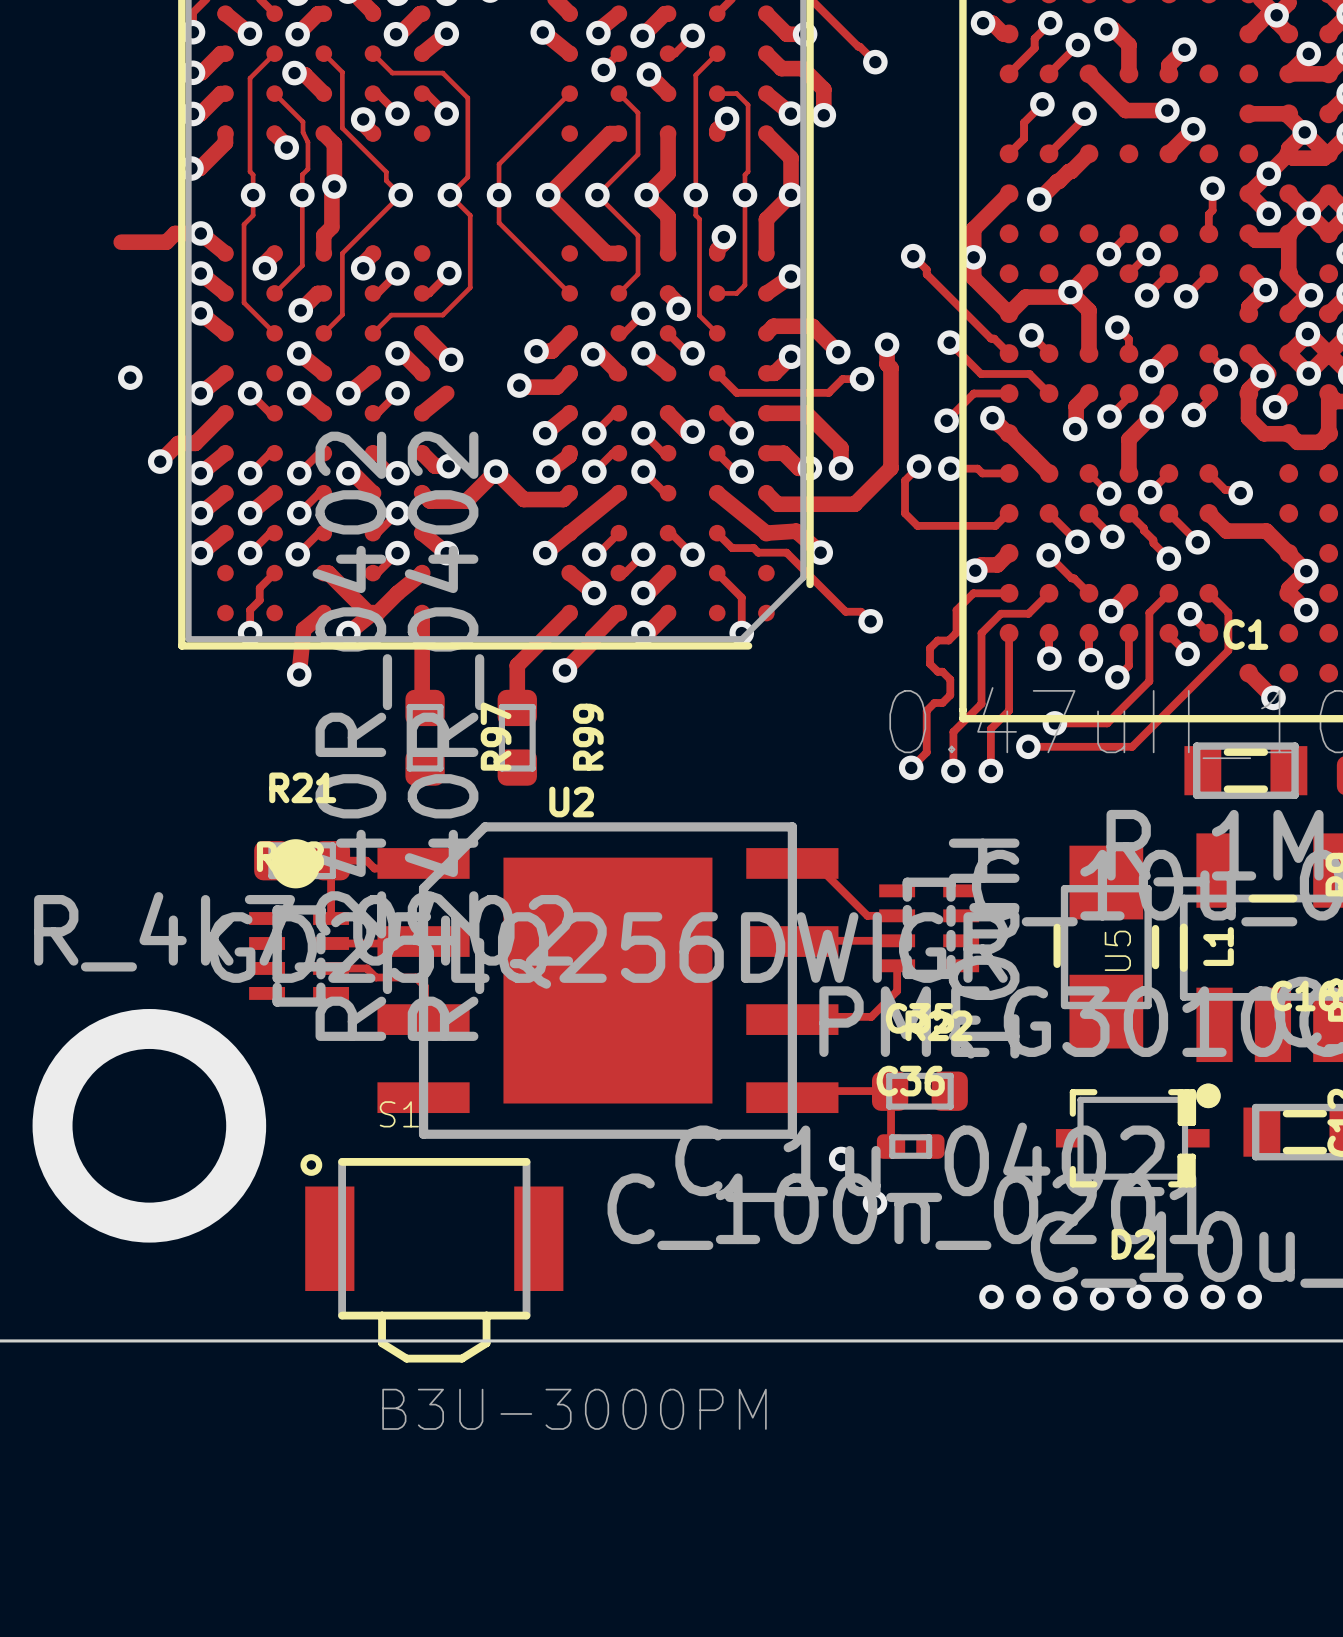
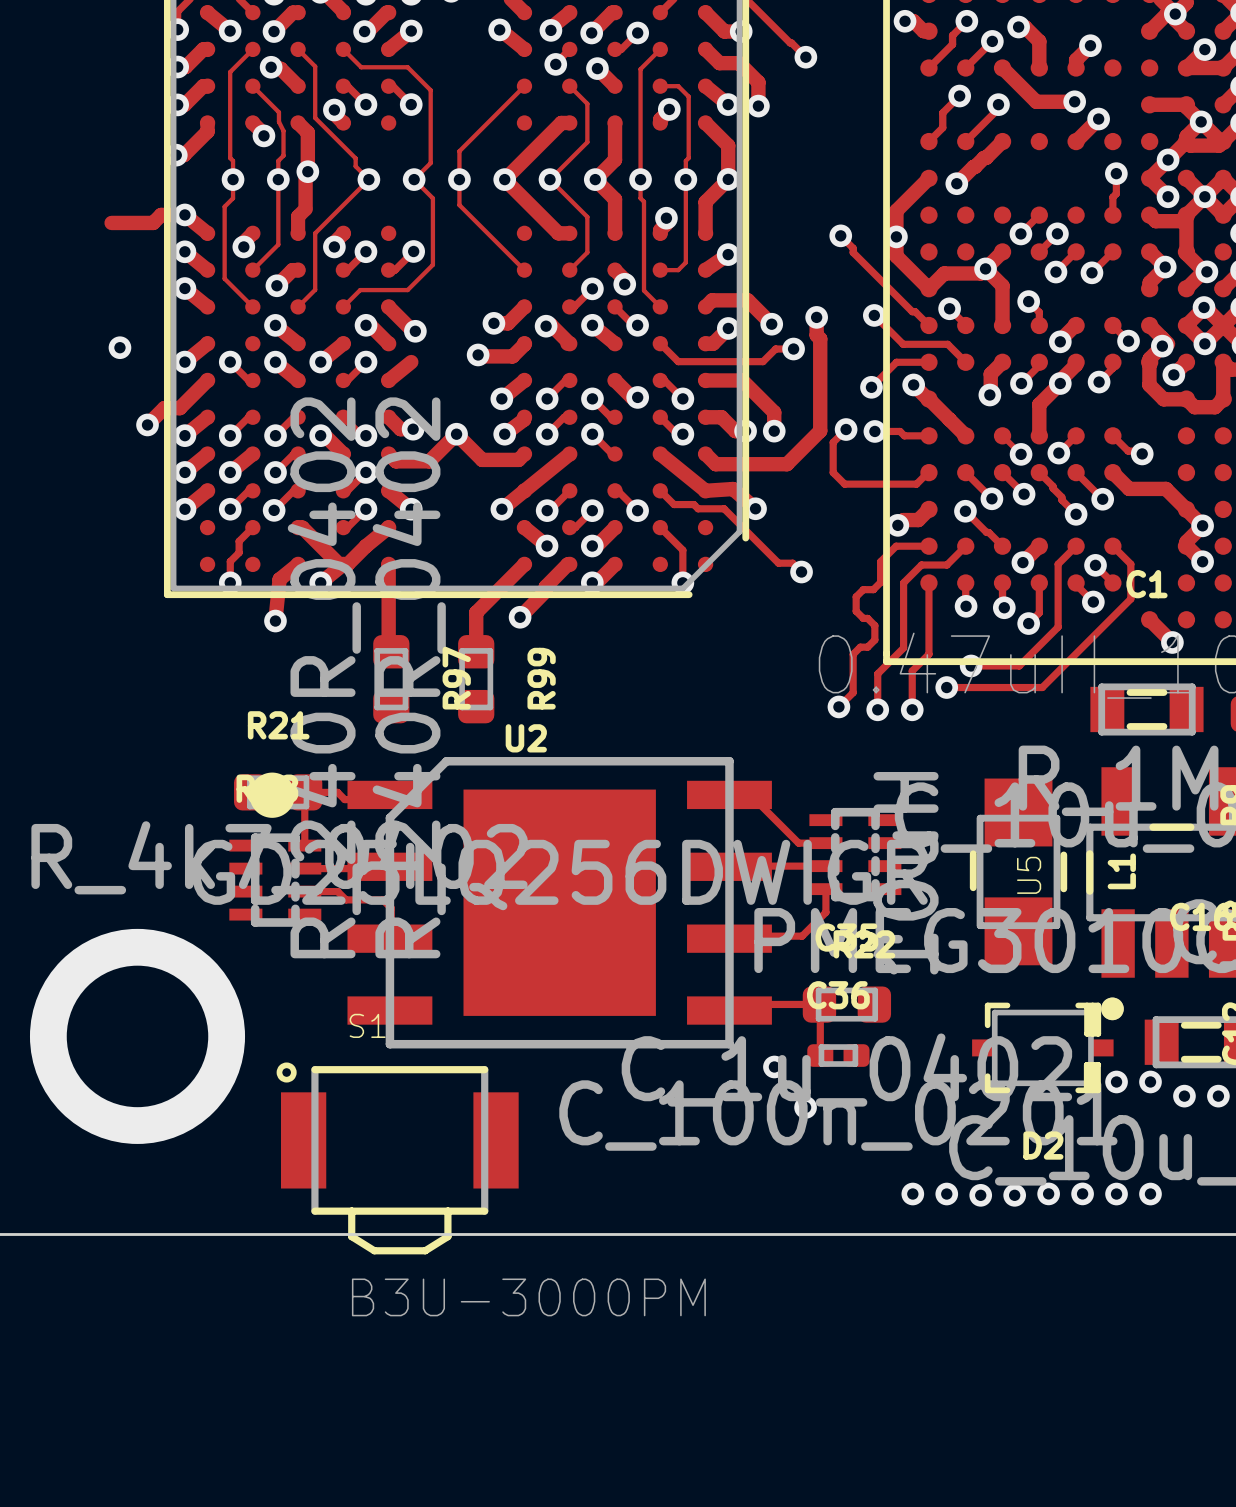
via: none -> (1116, 1081)
via: none -> (1150, 1081)
via: none -> (1184, 1096)
via: none -> (1218, 1096)

